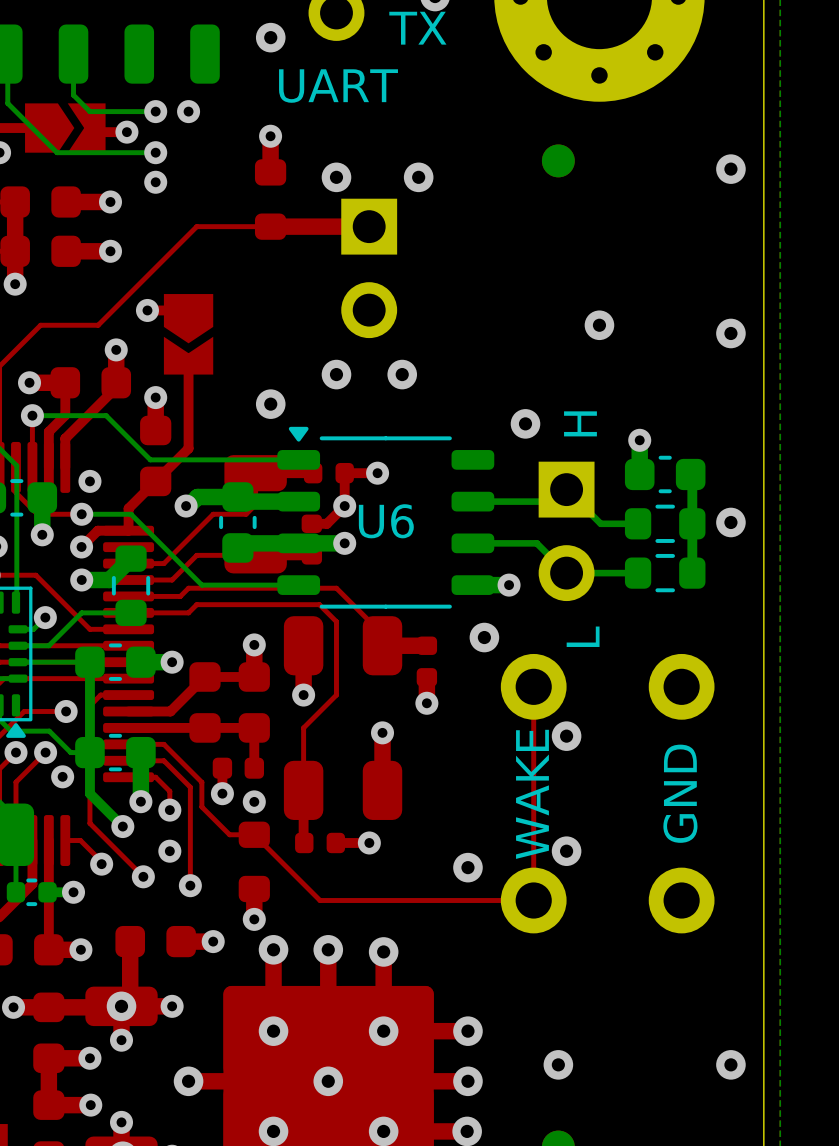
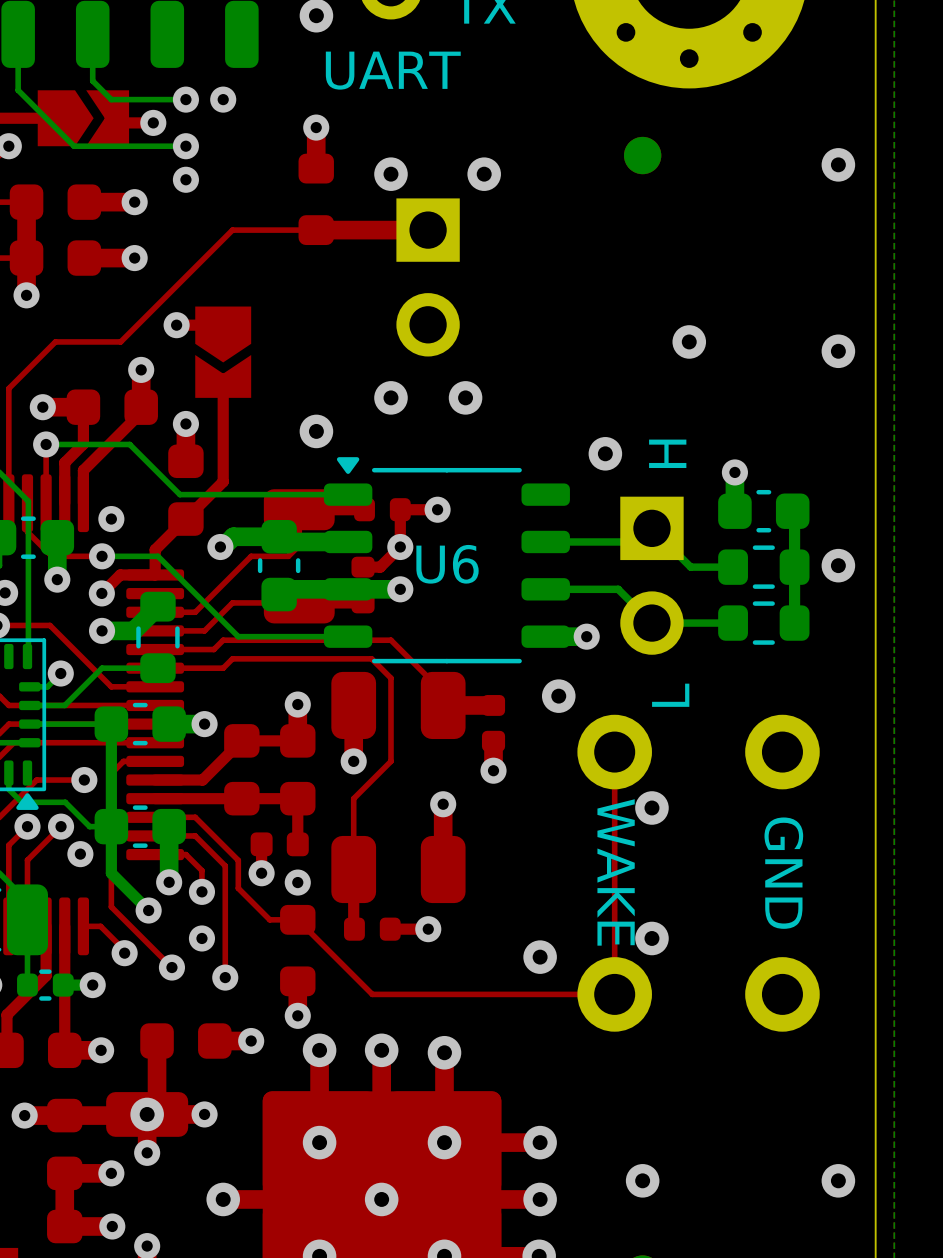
text rotation: 0° (680, 793) -> 180° (783, 873)
text rotation: 0° (532, 794) -> 180° (616, 872)

